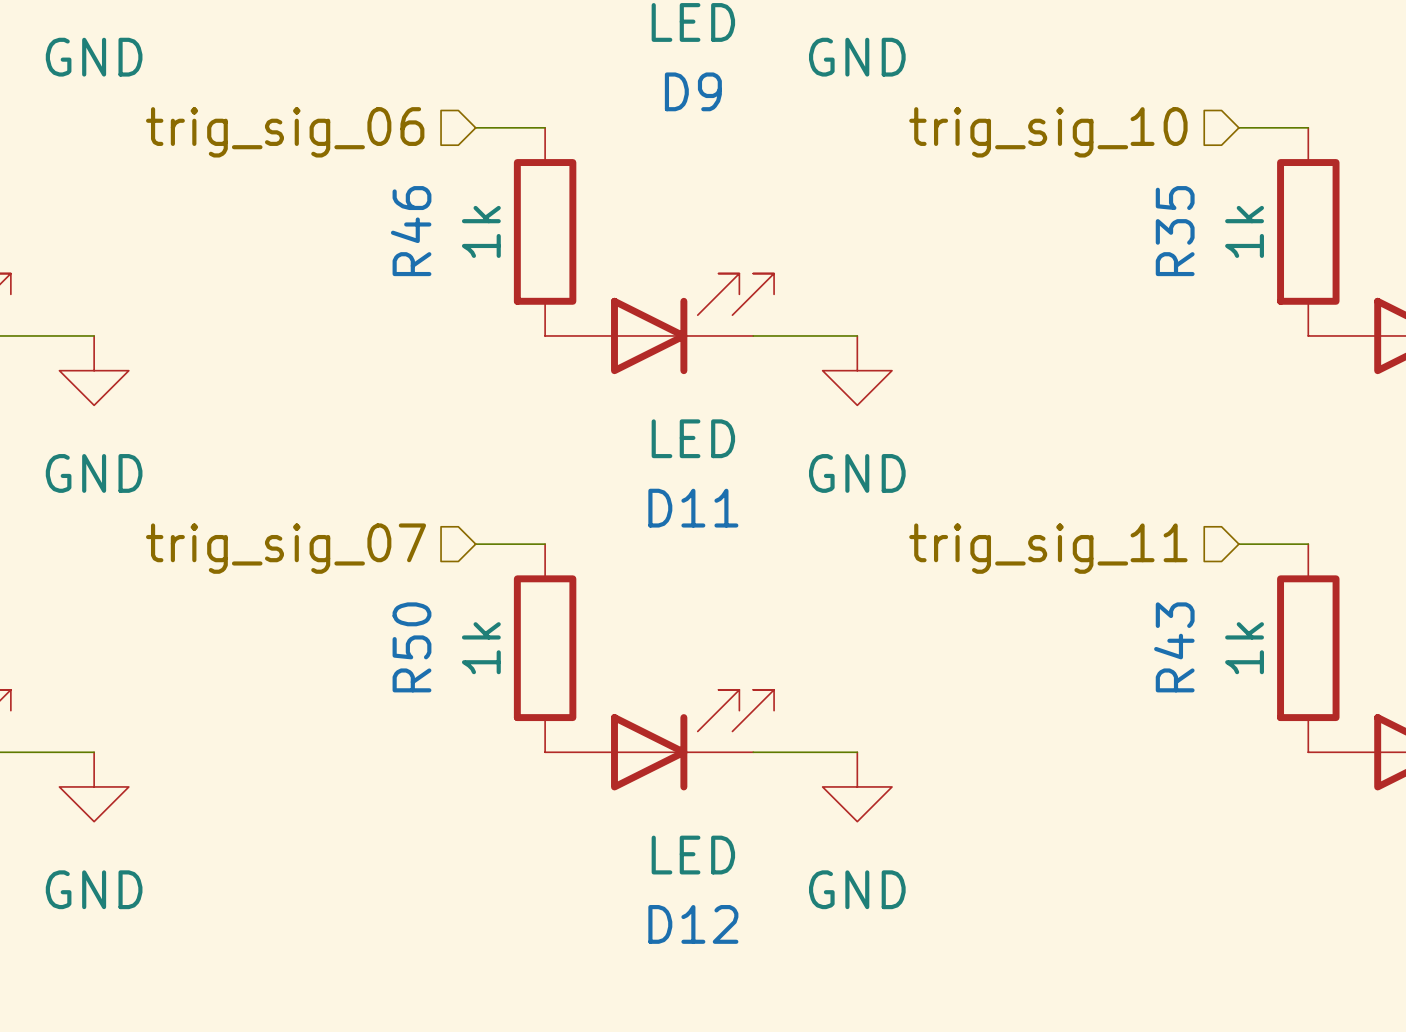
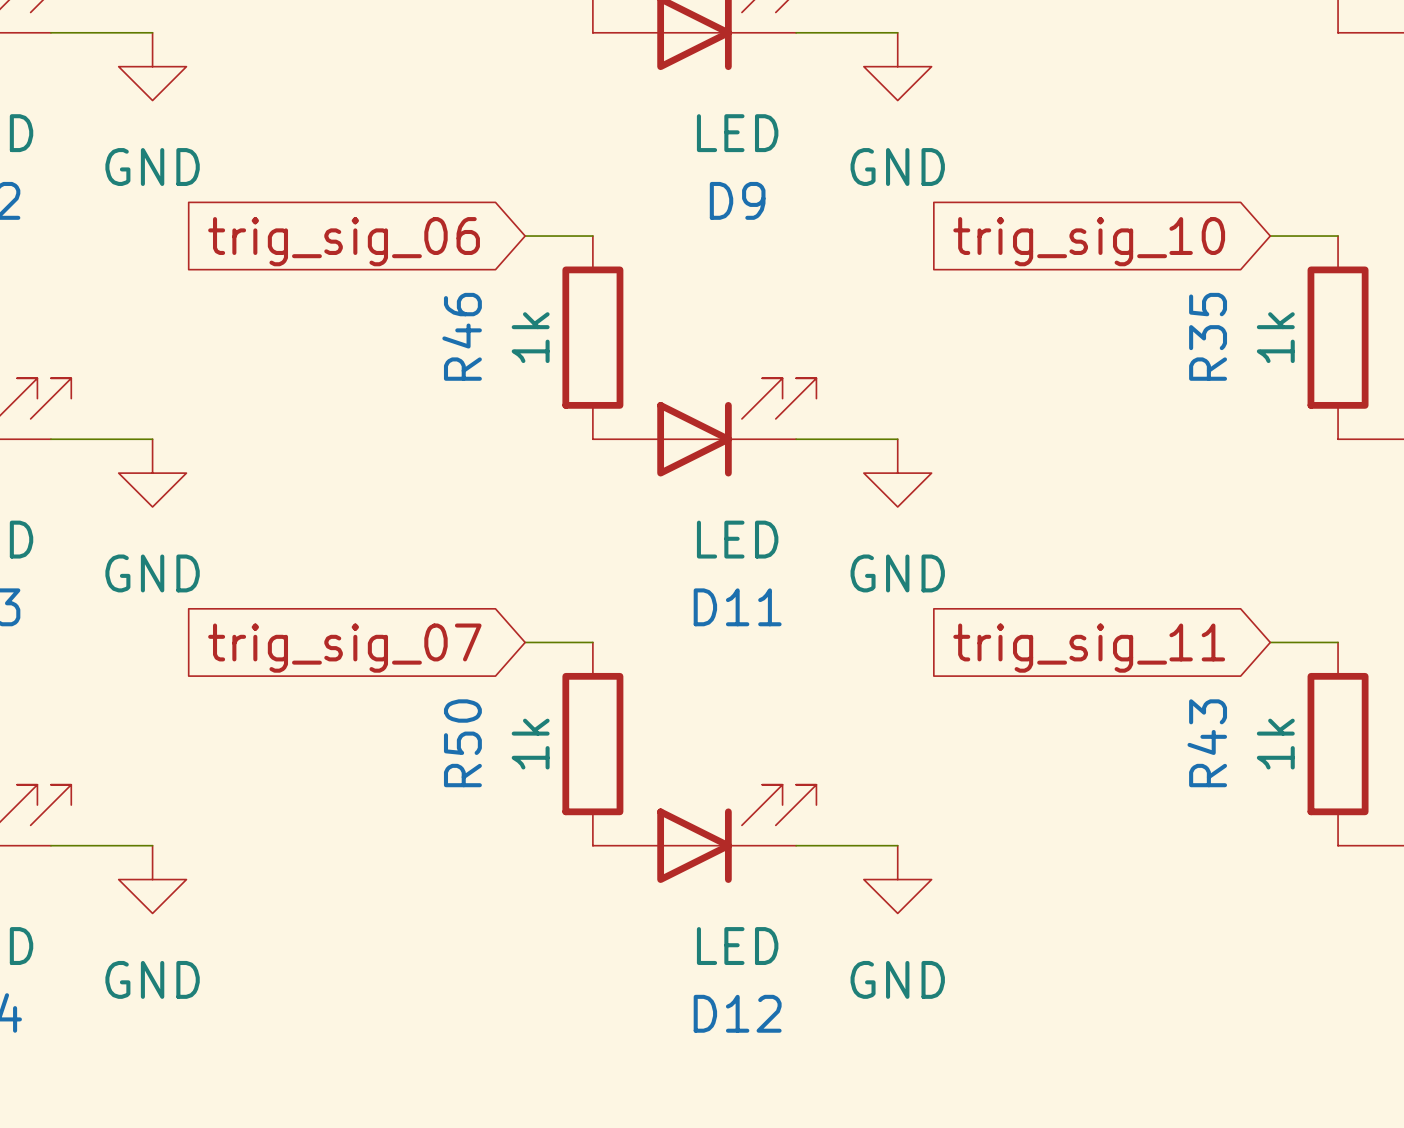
hierarchical label: trig_sig_06 (285, 132) -> none
hierarchical label: trig_sig_10 (1048, 132) -> none
global label: none -> trig_sig_06 (344, 241)
global label: none -> trig_sig_10 (1089, 241)
hierarchical label: trig_sig_07 (286, 548) -> none
hierarchical label: trig_sig_11 (1048, 548) -> none
global label: none -> trig_sig_07 (344, 648)
global label: none -> trig_sig_11 (1089, 648)

